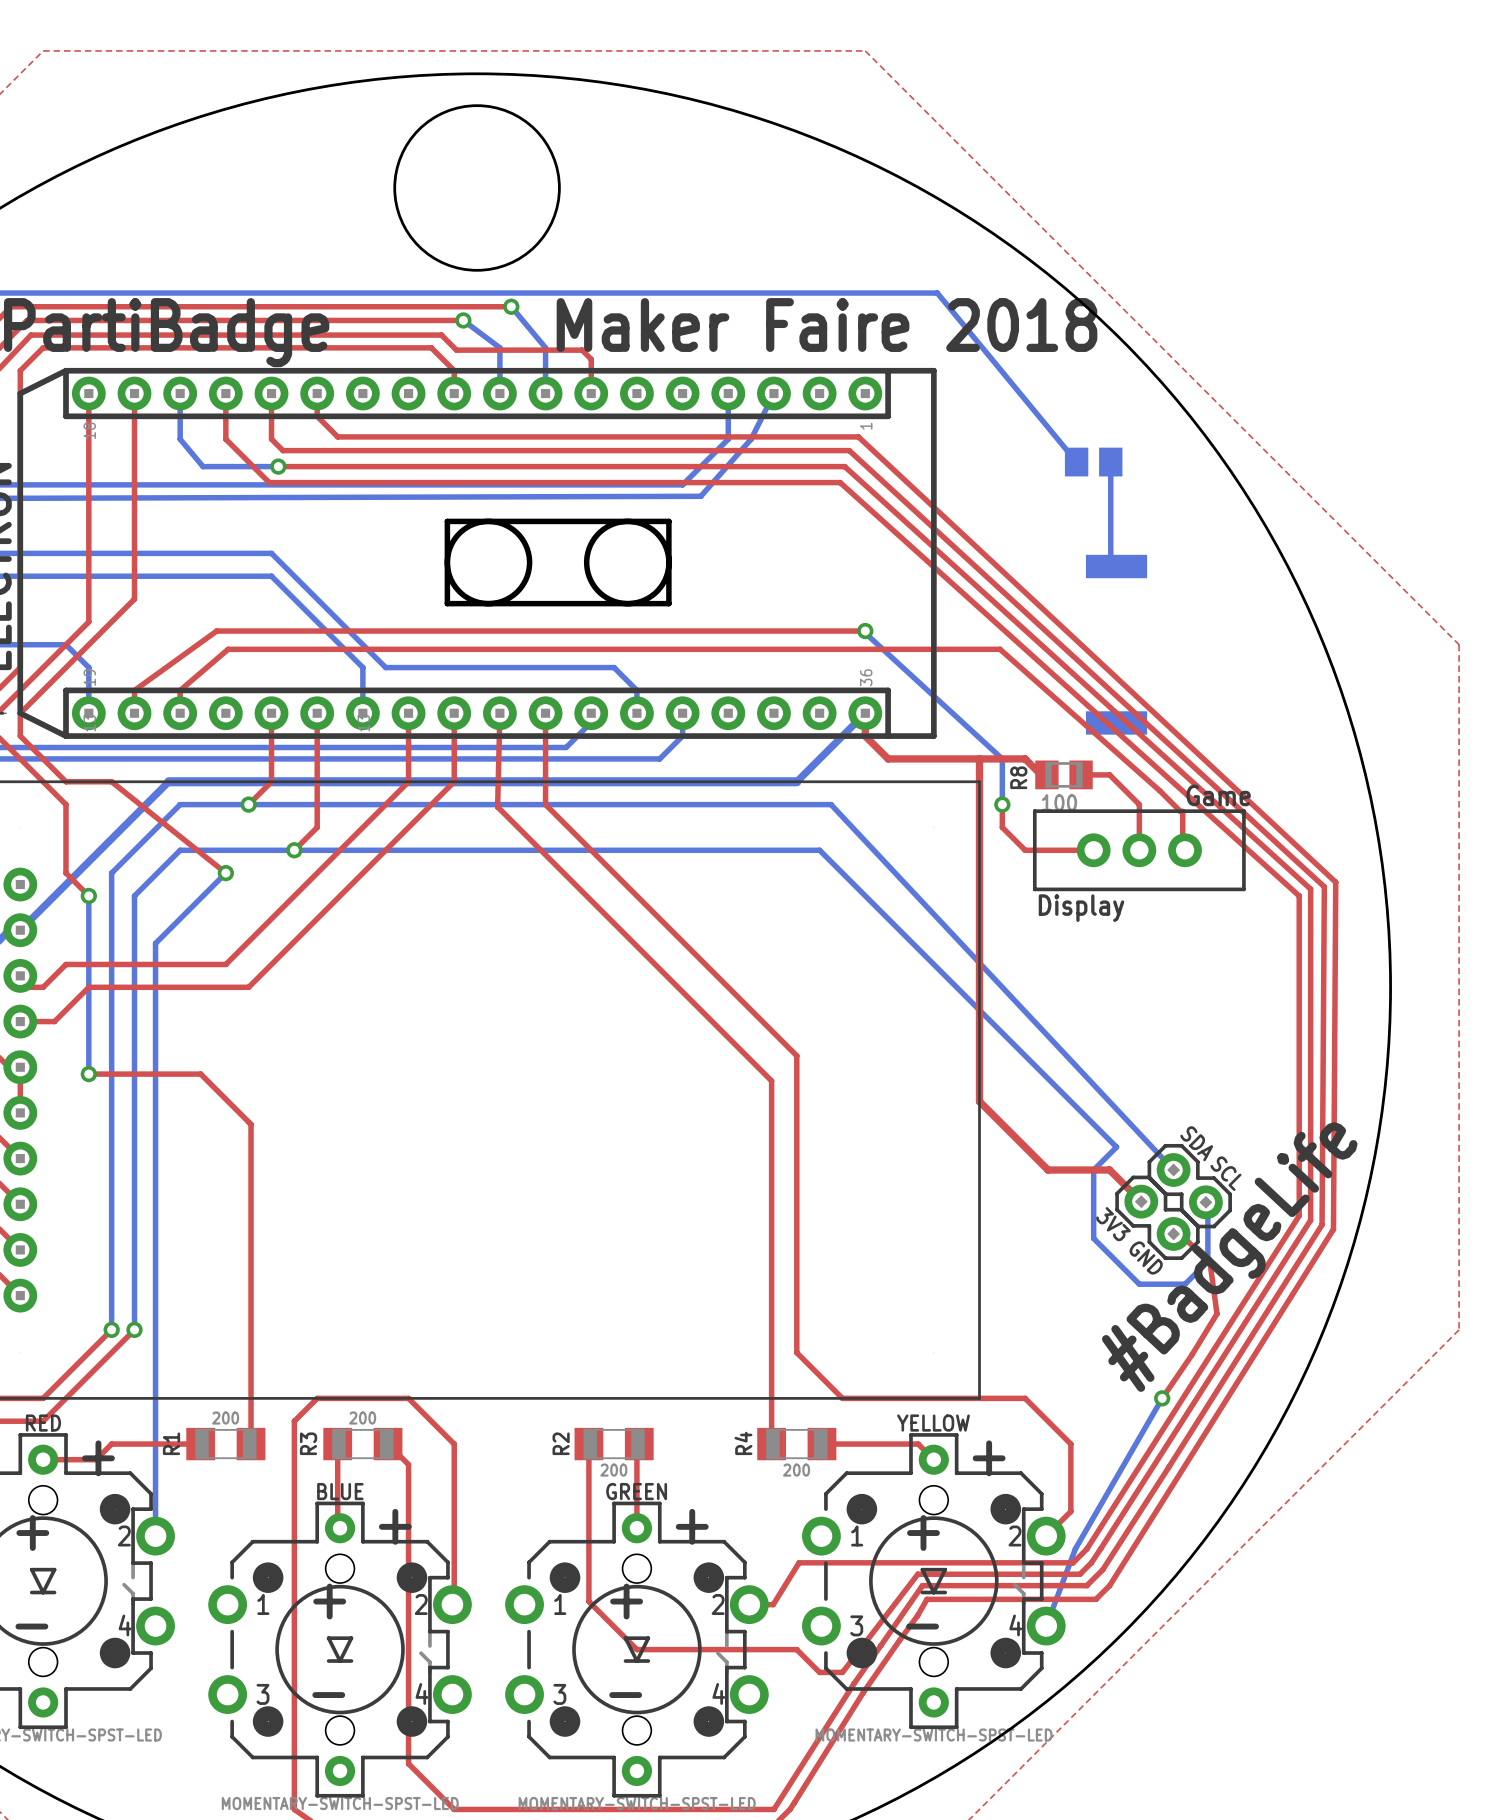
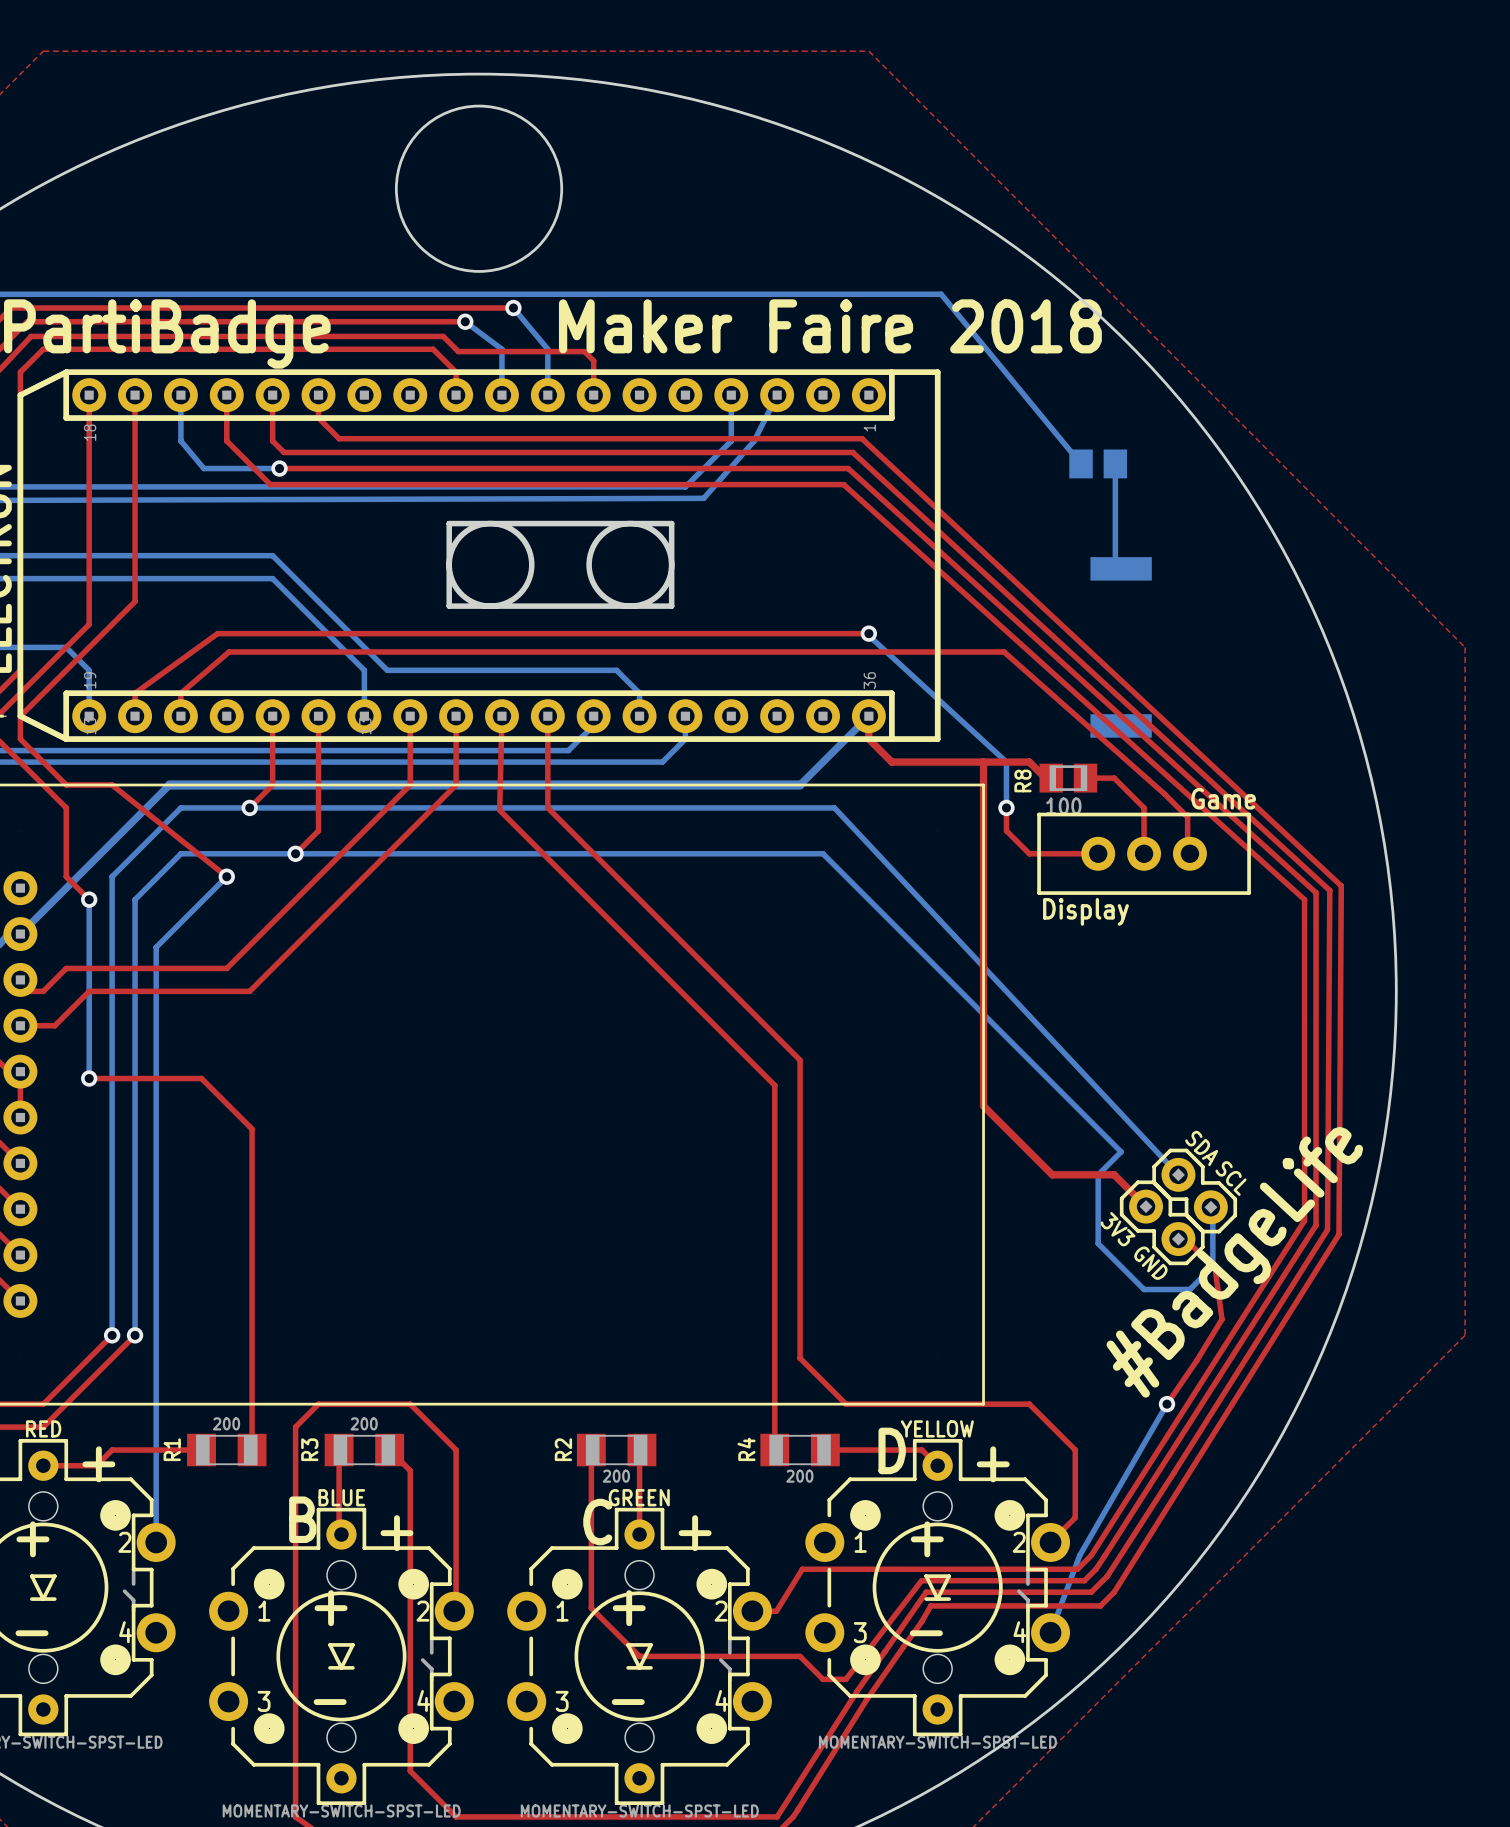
text: none -> D (892, 1450)
text: none -> B (302, 1519)
text: none -> C (597, 1522)

